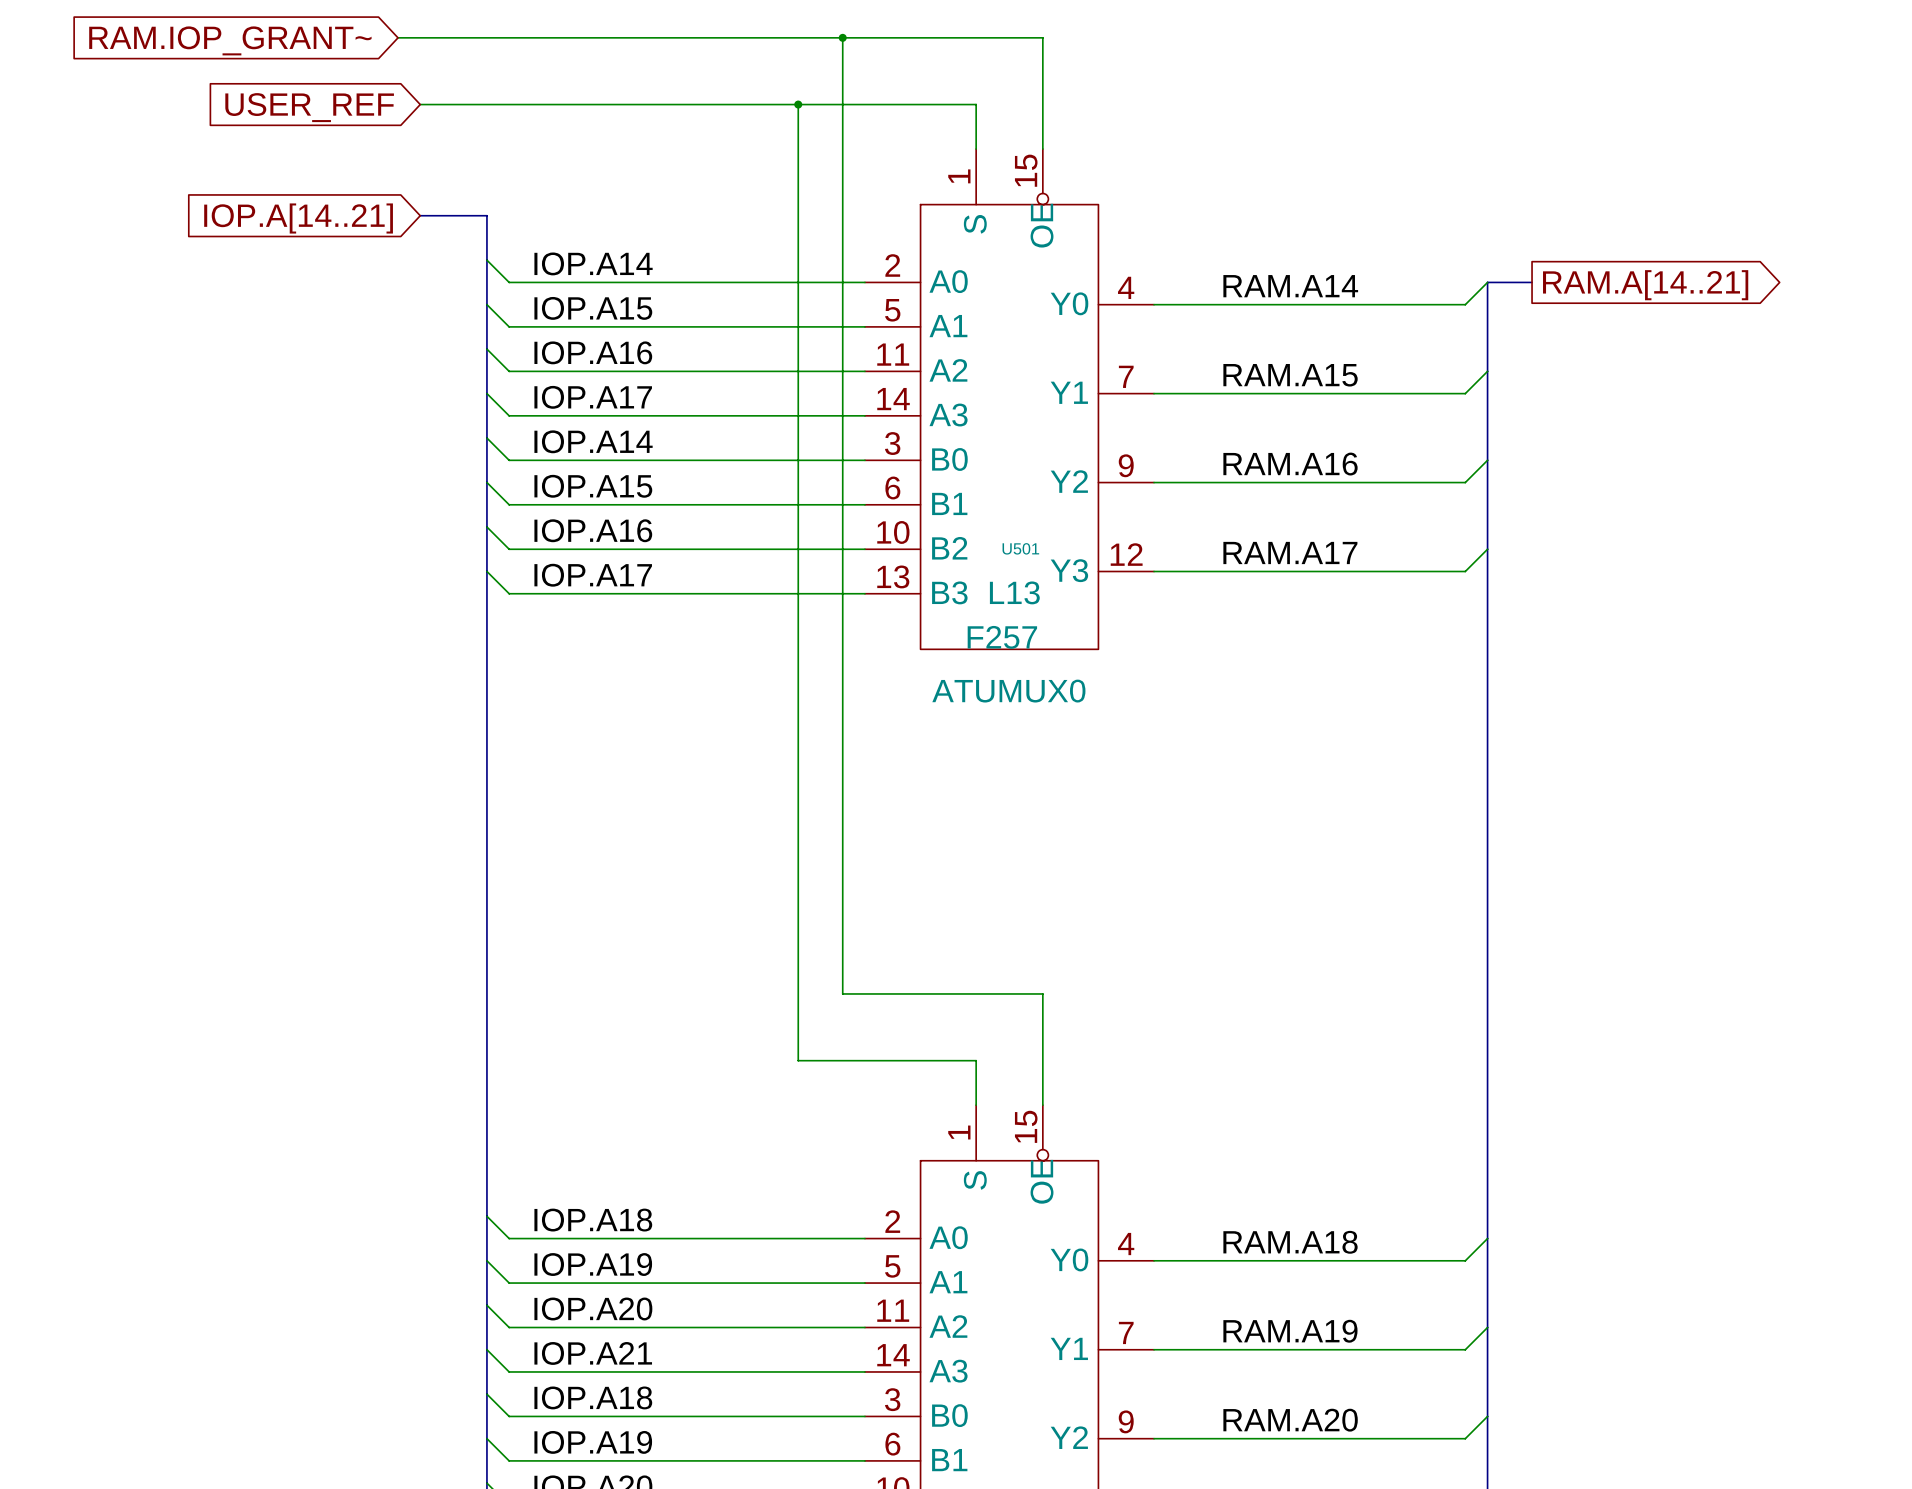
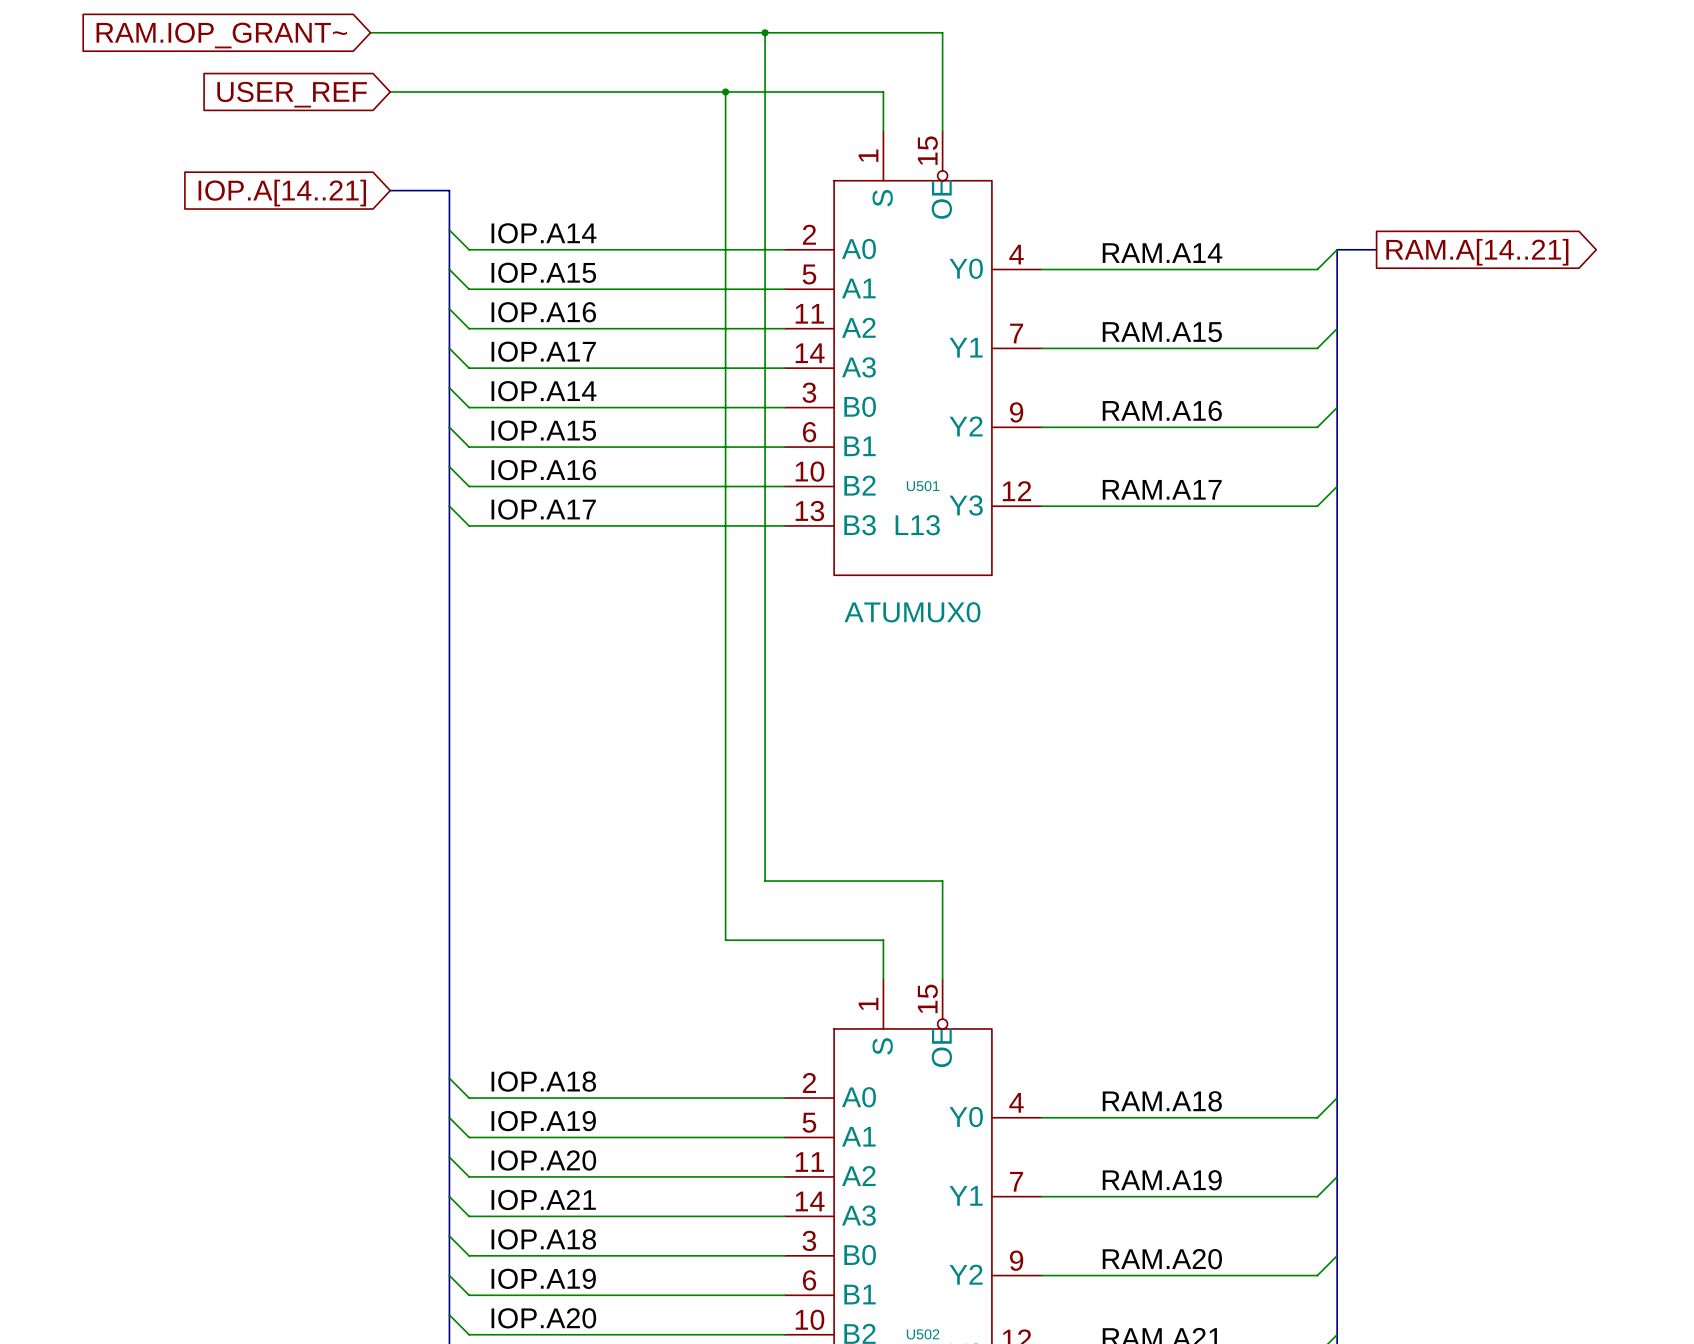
U501 value: F257 (1002, 637) -> none

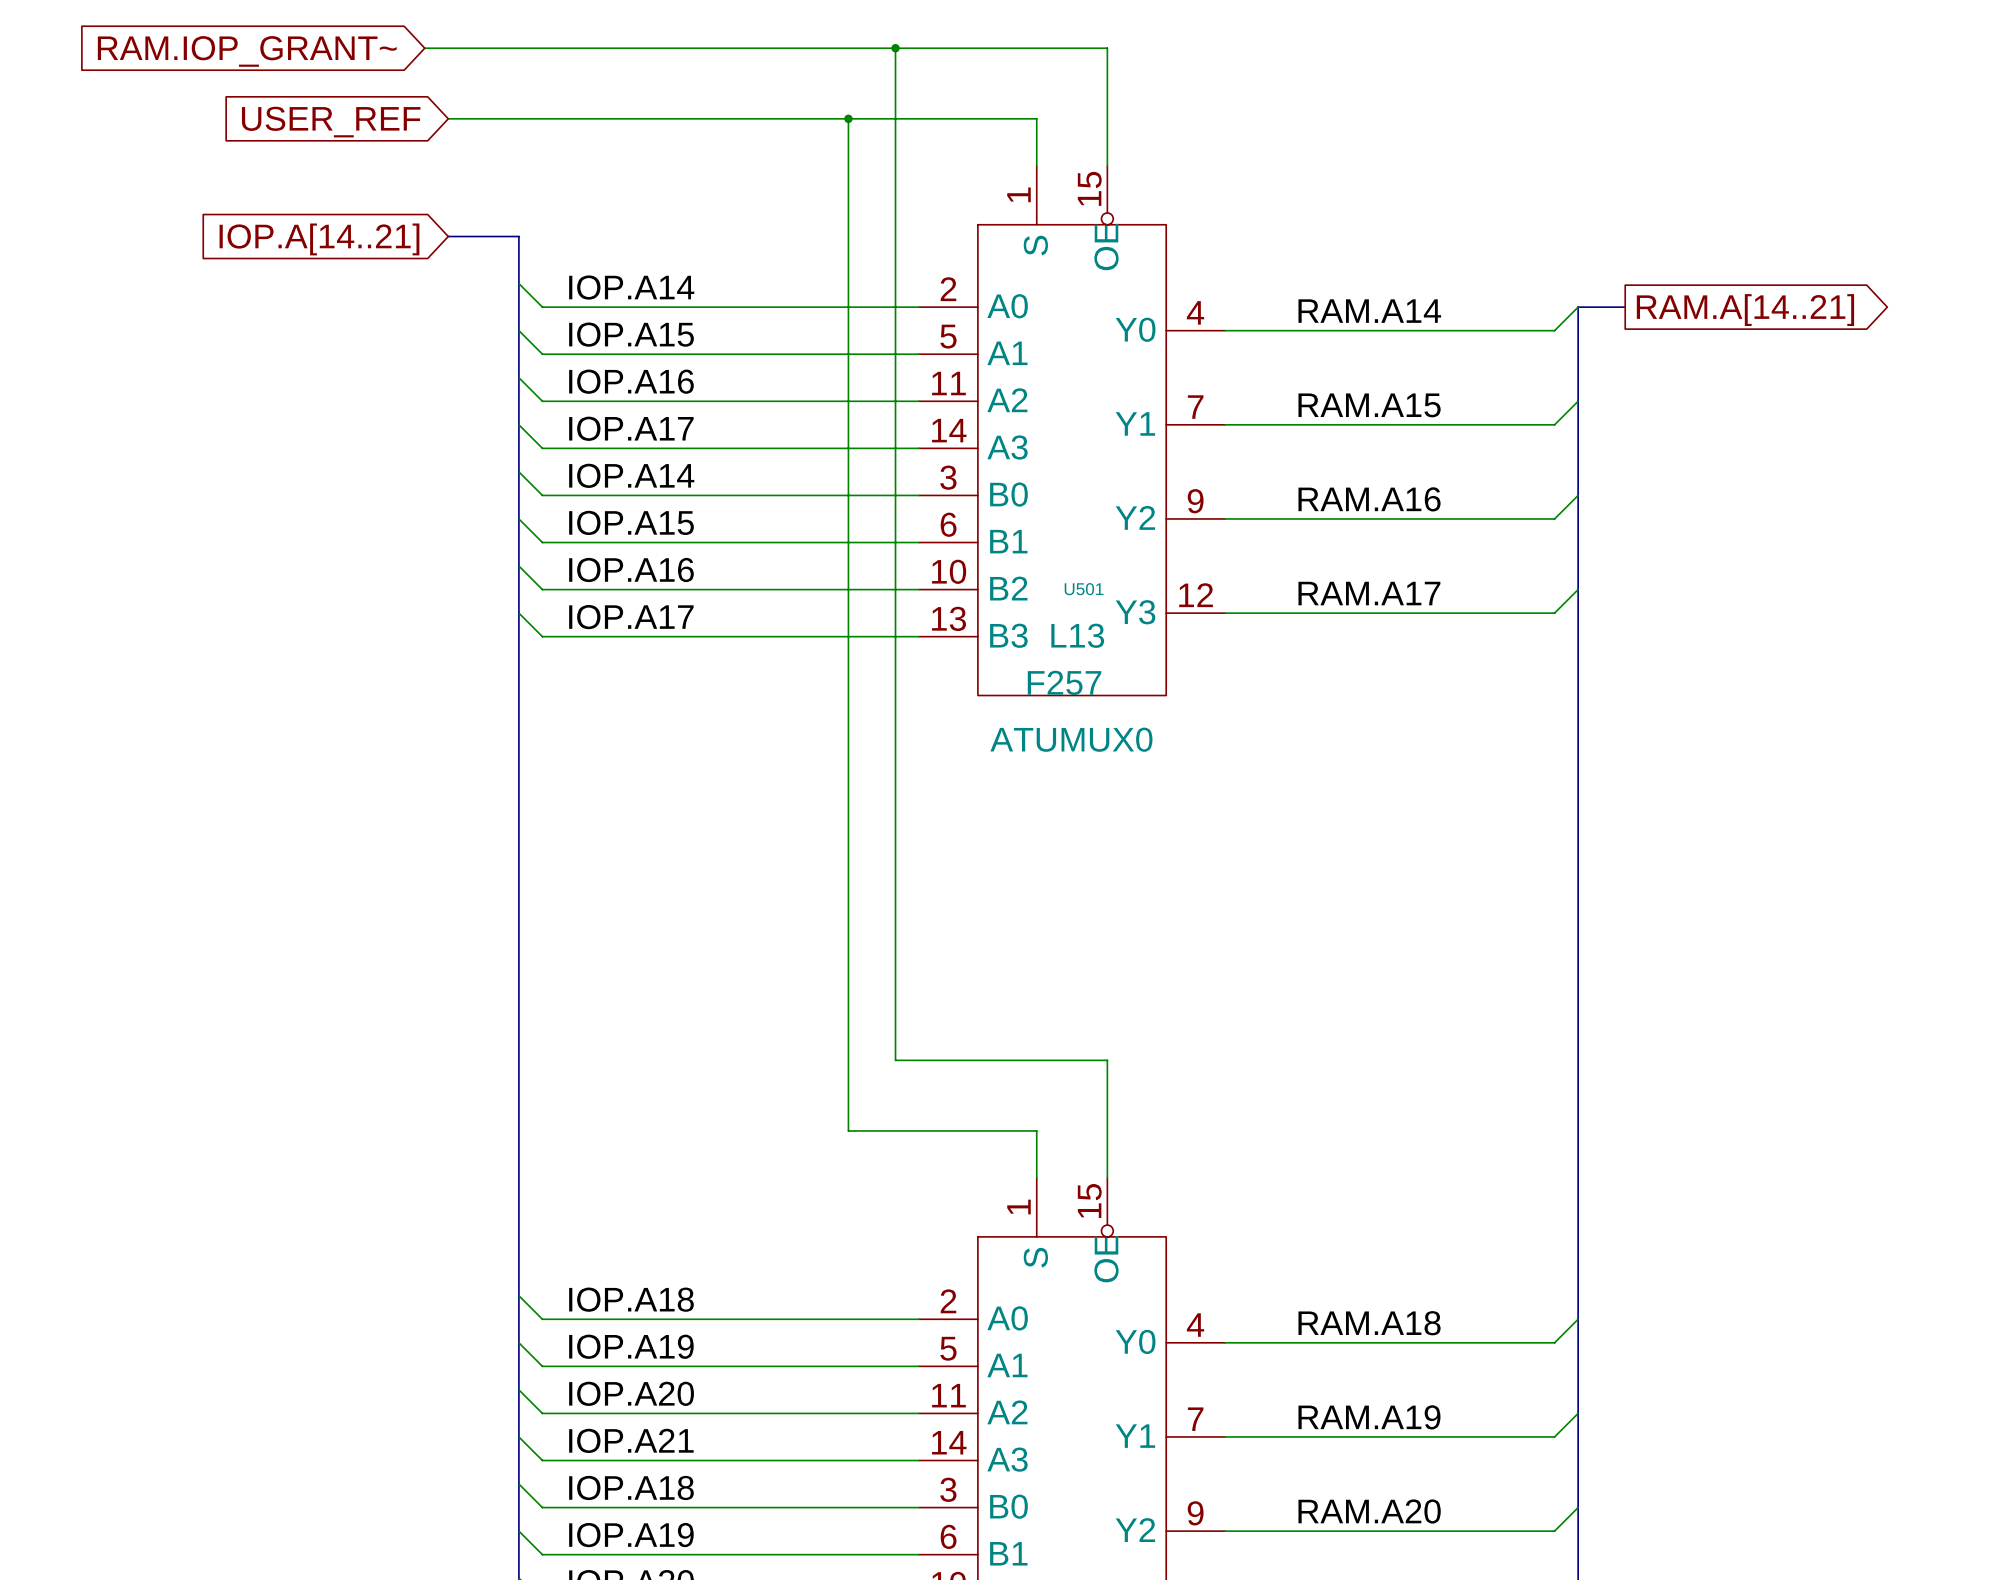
U501 value: none -> F257 (1064, 682)

